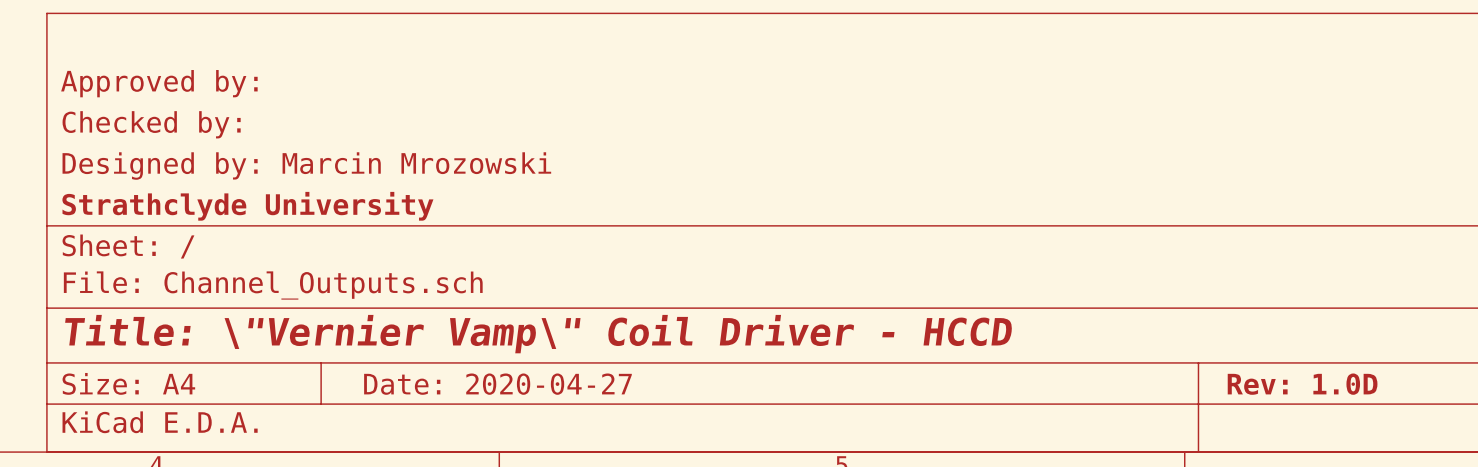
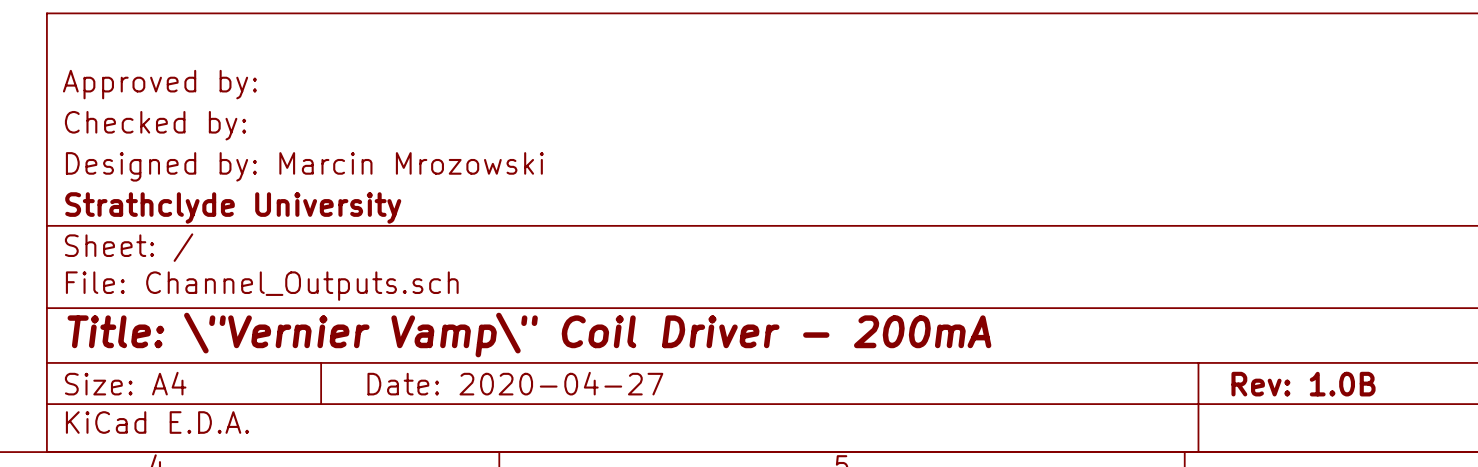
title block: Title: \"Vernier Vamp\" Coil Driver - HCCD (538, 334) -> Title: \"Vernier Vamp\" Coil Driver - 200mA (529, 335)
title block: Rev: 1.0D (1302, 384) -> Rev: 1.0B (1303, 384)

